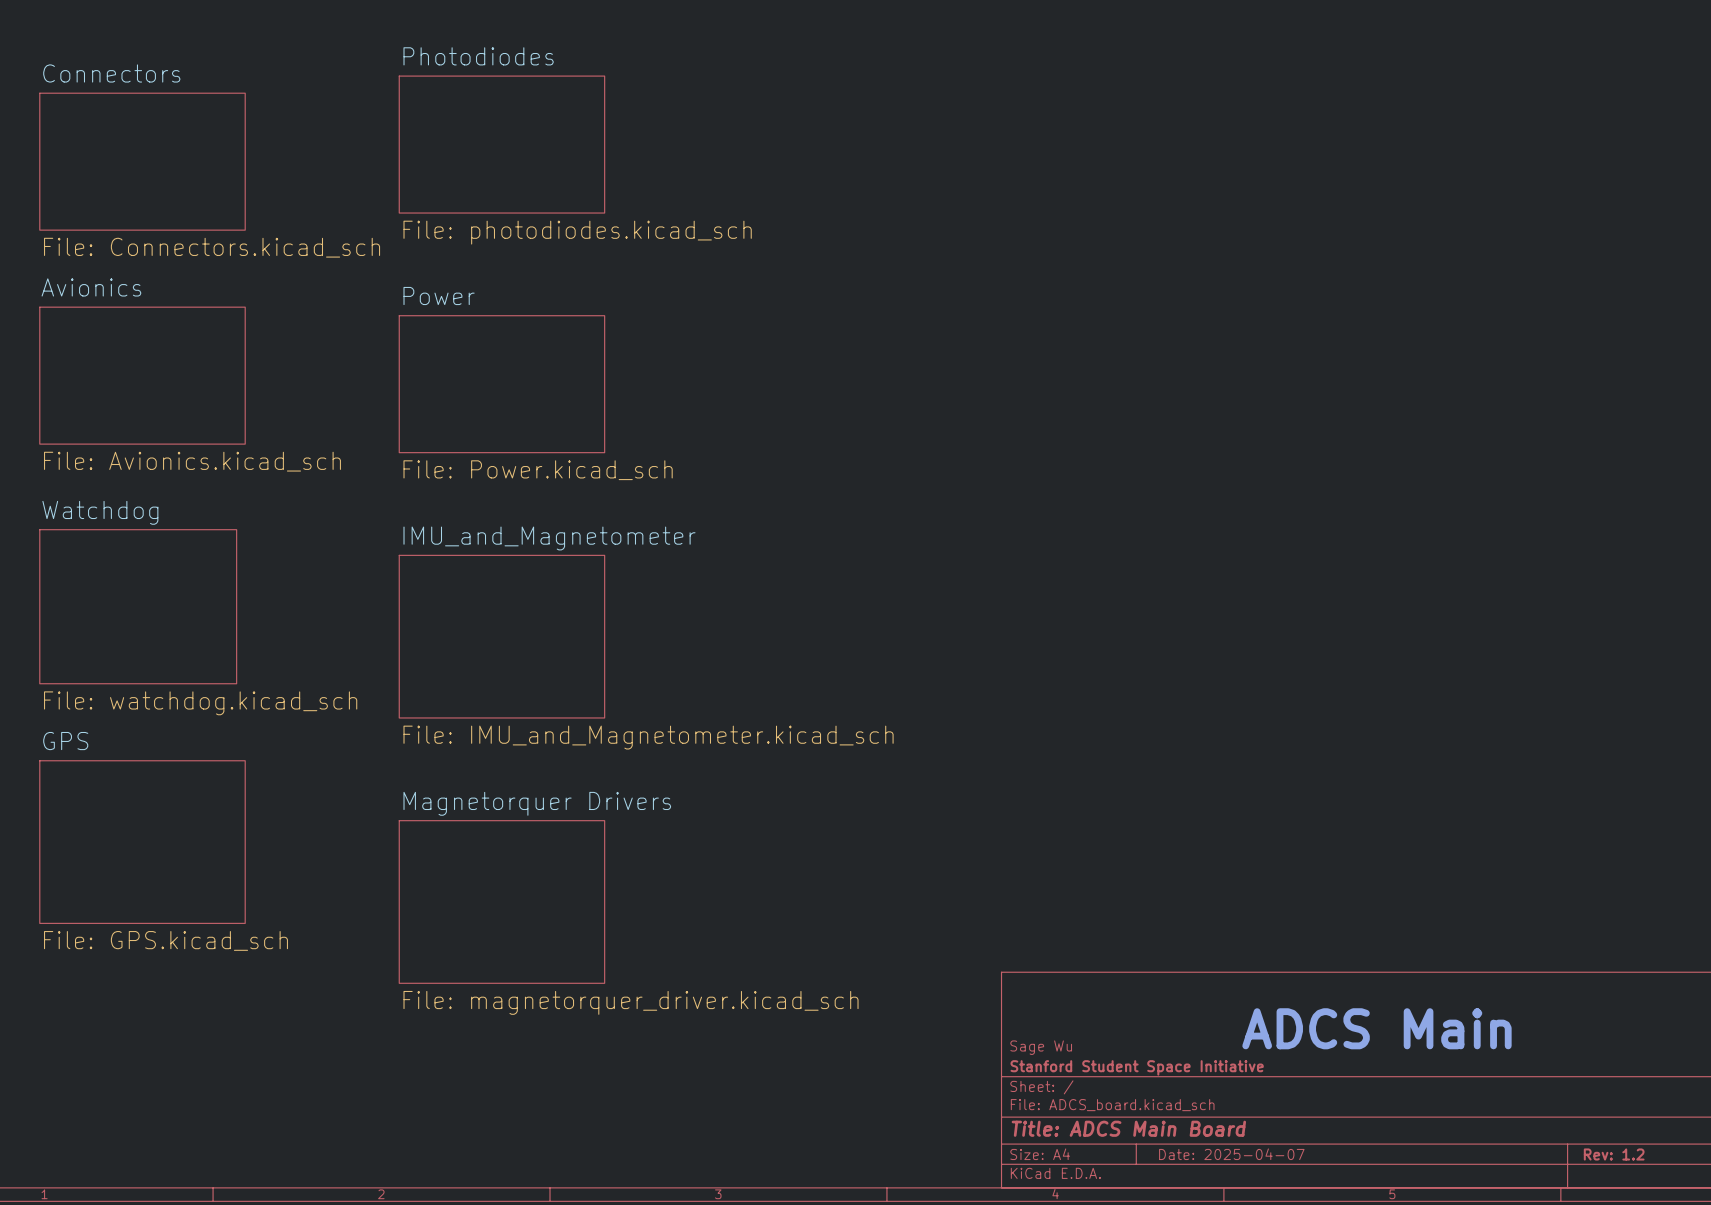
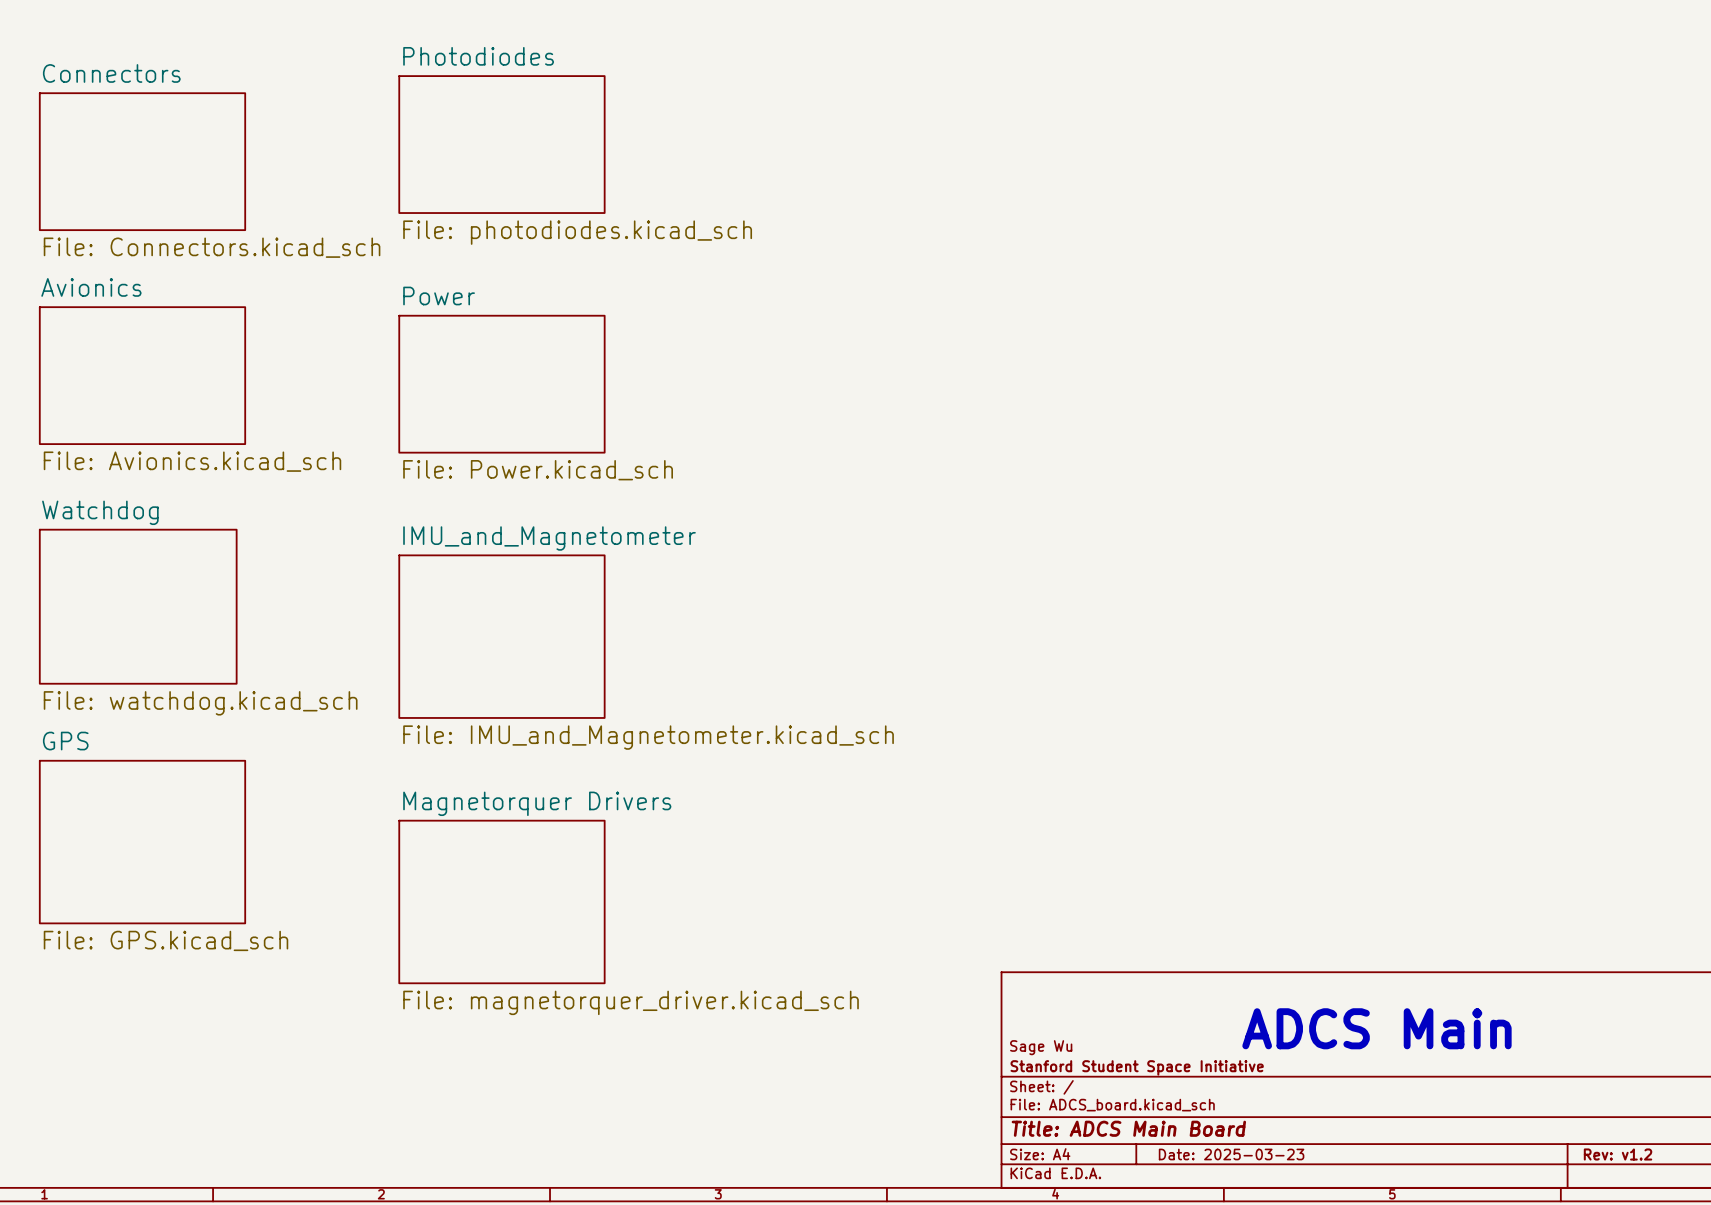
title block: Date: 2025-04-07 (1231, 1154) -> Date: 2025-03-23 (1231, 1154)
title block: Rev: 1.2 (1614, 1154) -> Rev: v1.2 (1618, 1154)

